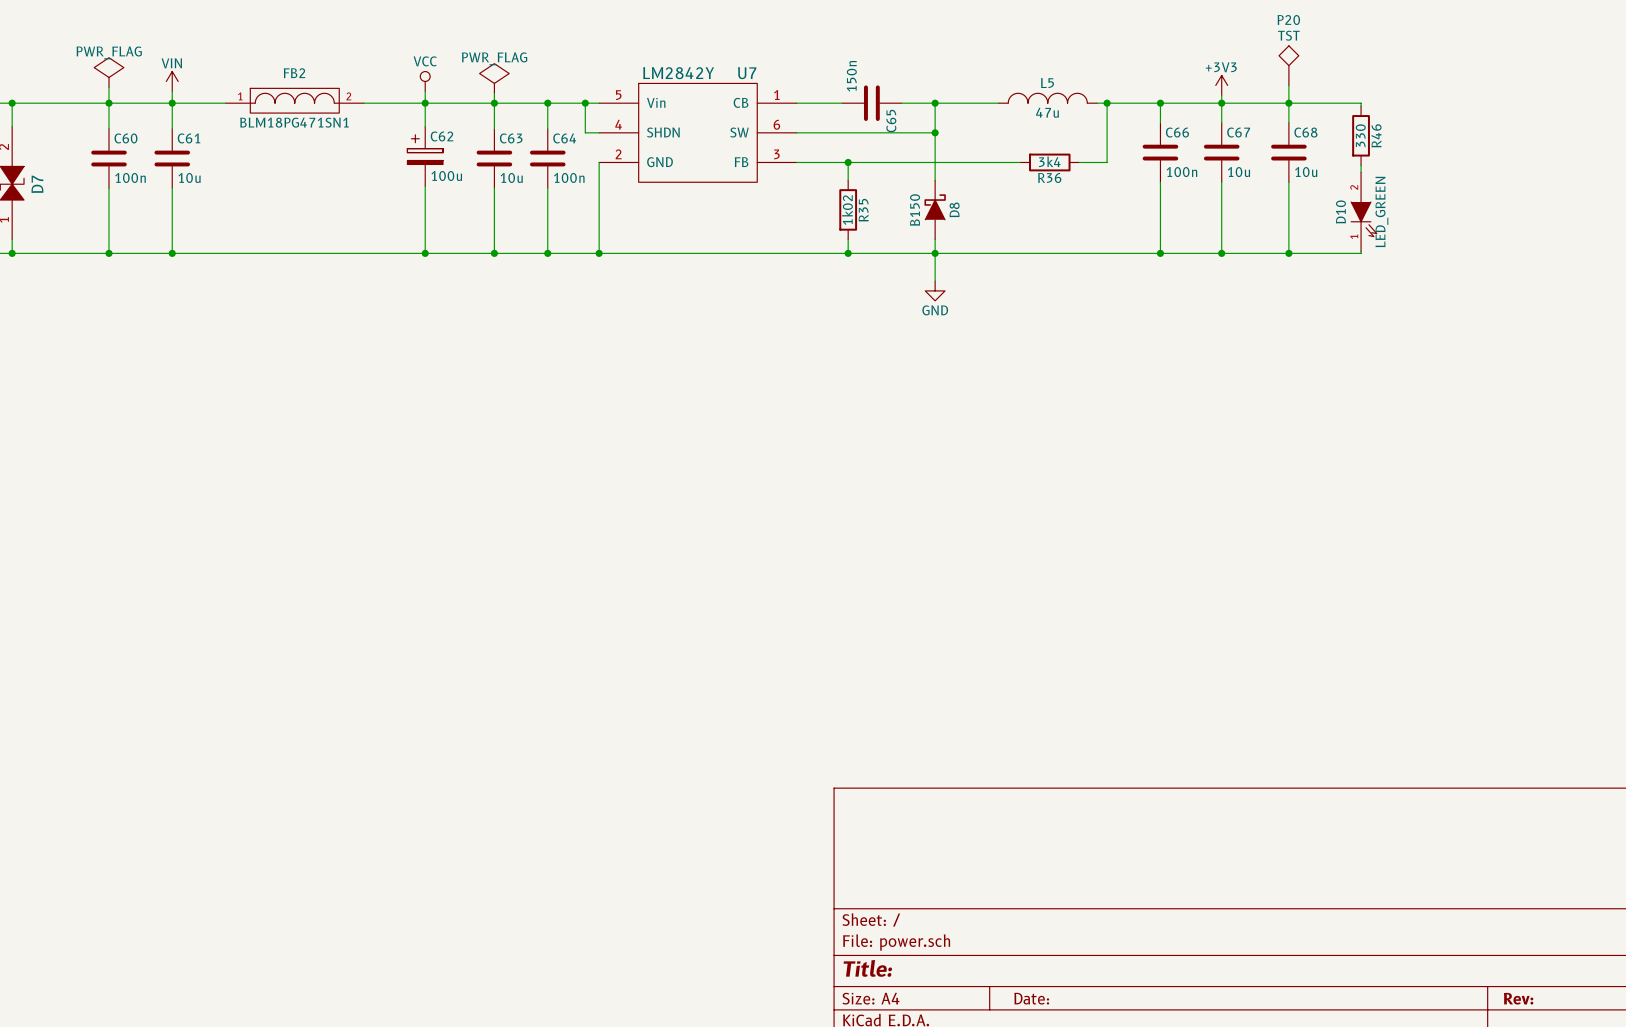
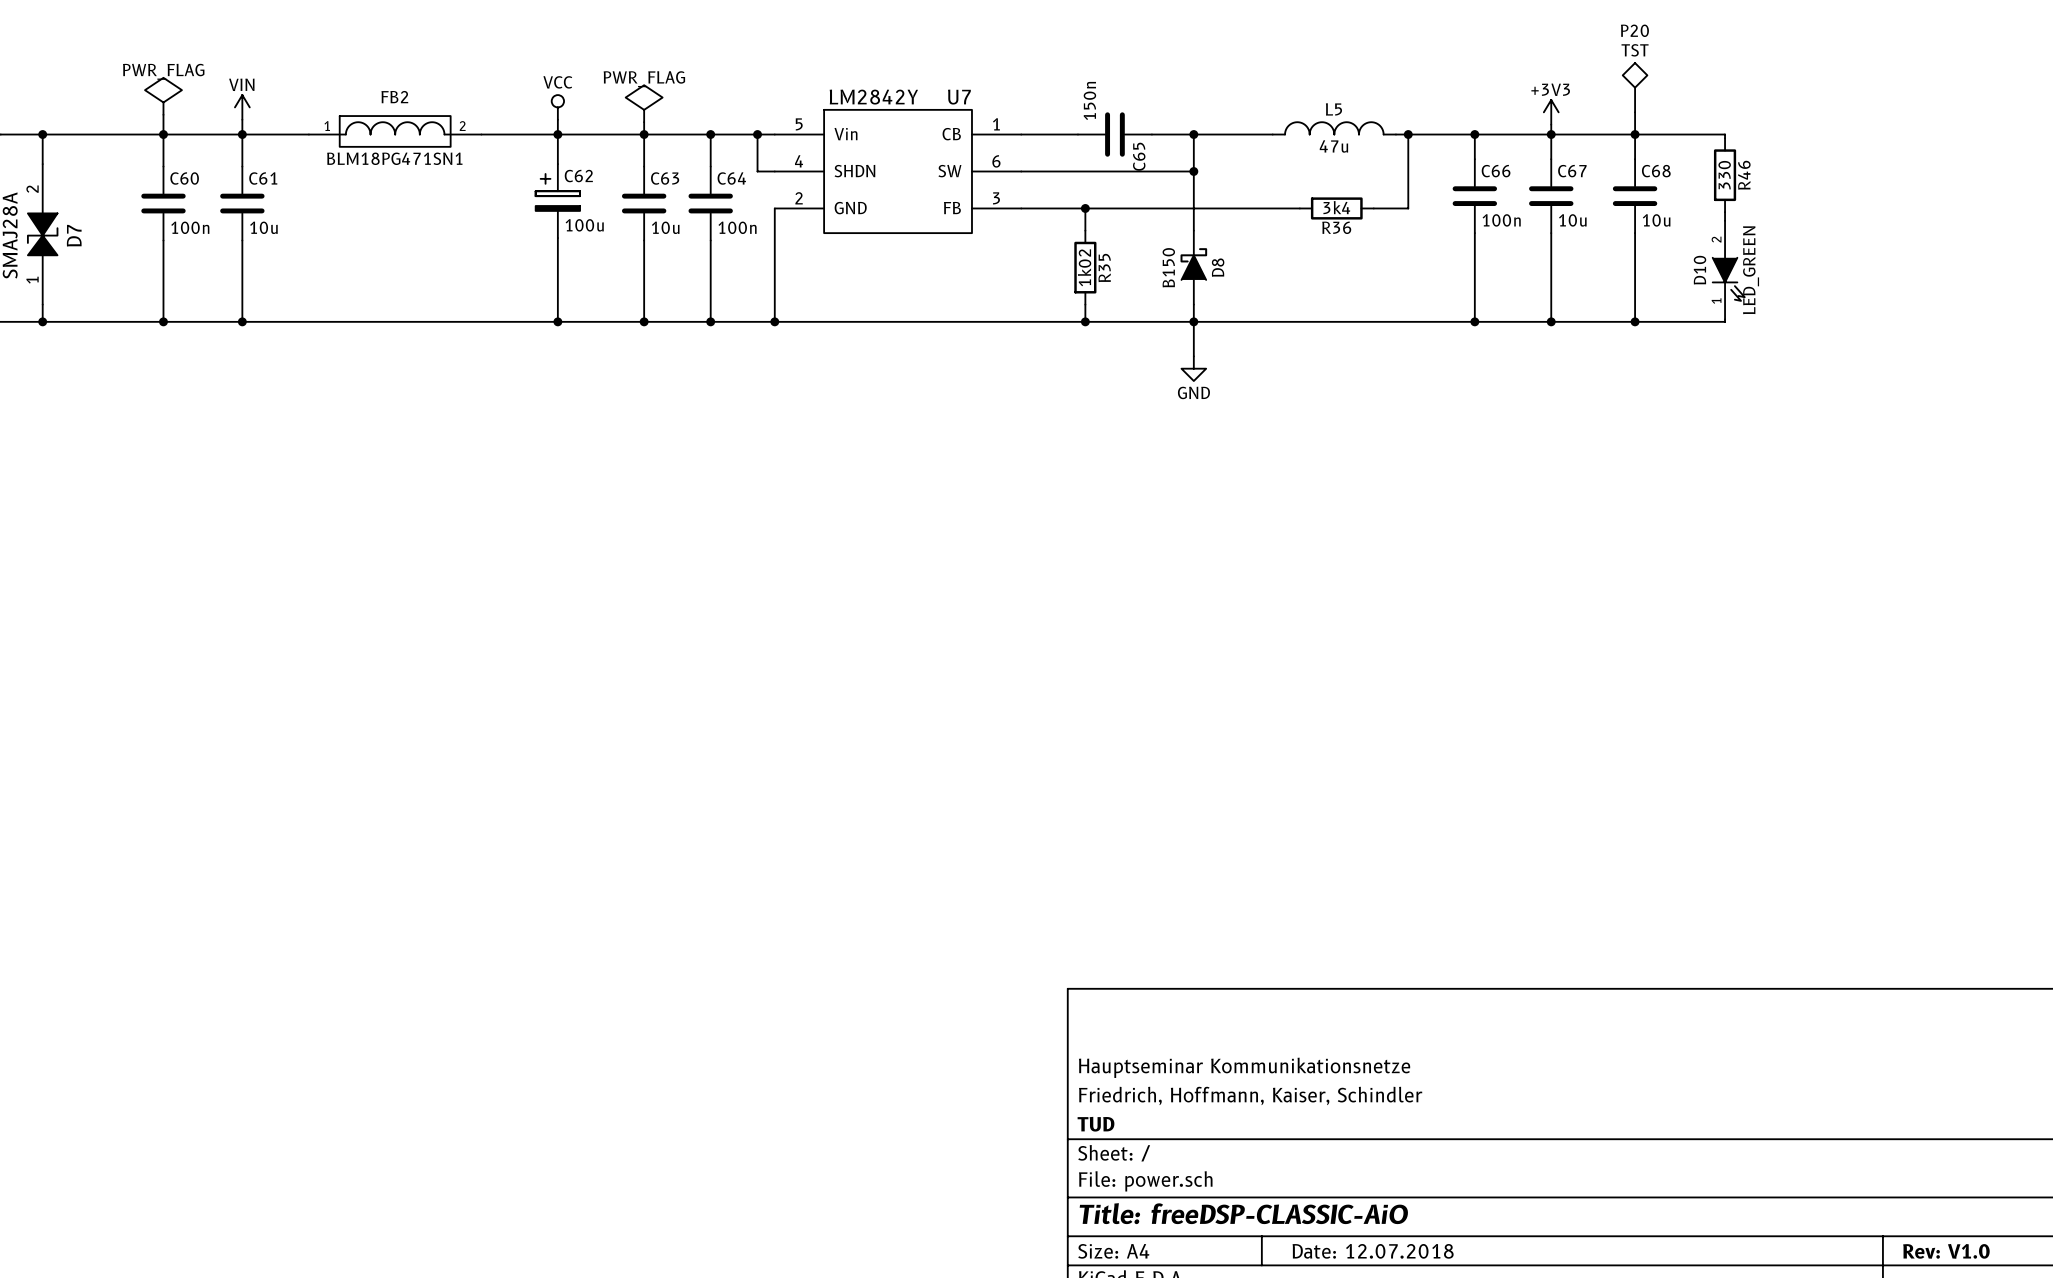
title block: none -> Hauptseminar Kommunikationsnetze (1244, 1067)
title block: none -> Friedrich, Hoffmann, Kaiser, Schindler (1250, 1095)
title block: none -> TUD (1095, 1124)
title block: Title: (867, 968) -> Title: freeDSP-CLASSIC-AiO (1243, 1213)
title block: Date: (1031, 998) -> Date: 12.07.2018 (1373, 1251)
title block: Rev: (1518, 998) -> Rev: V1.0 (1946, 1251)

